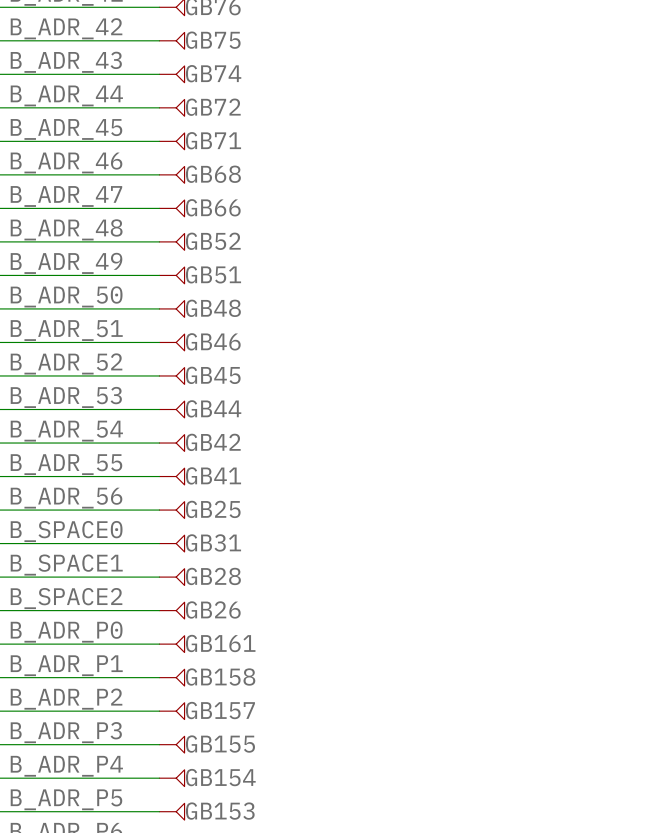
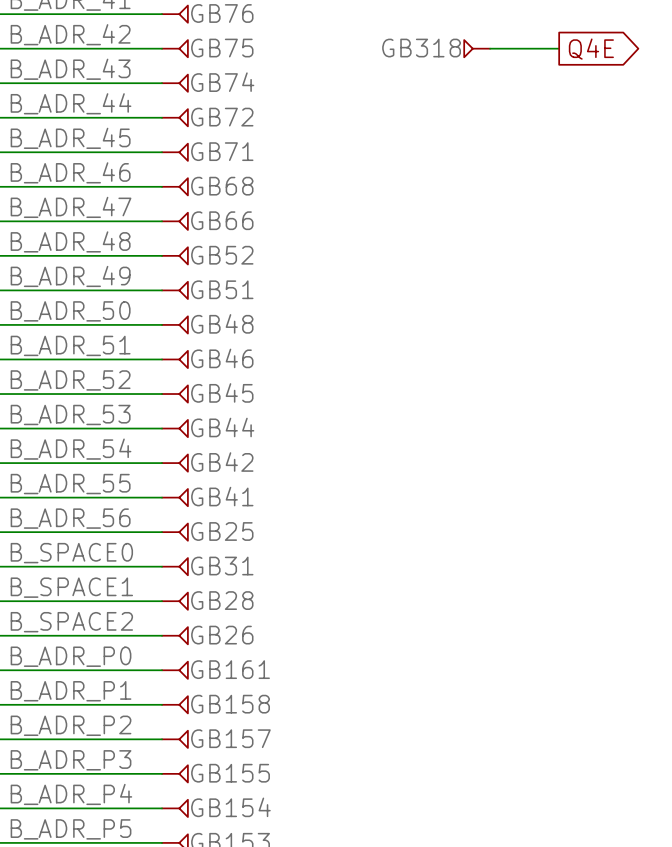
GB318: none -> (476, 48)
wire: none -> (490, 48) (559, 48)
global label: none -> Q4E (591, 49)

